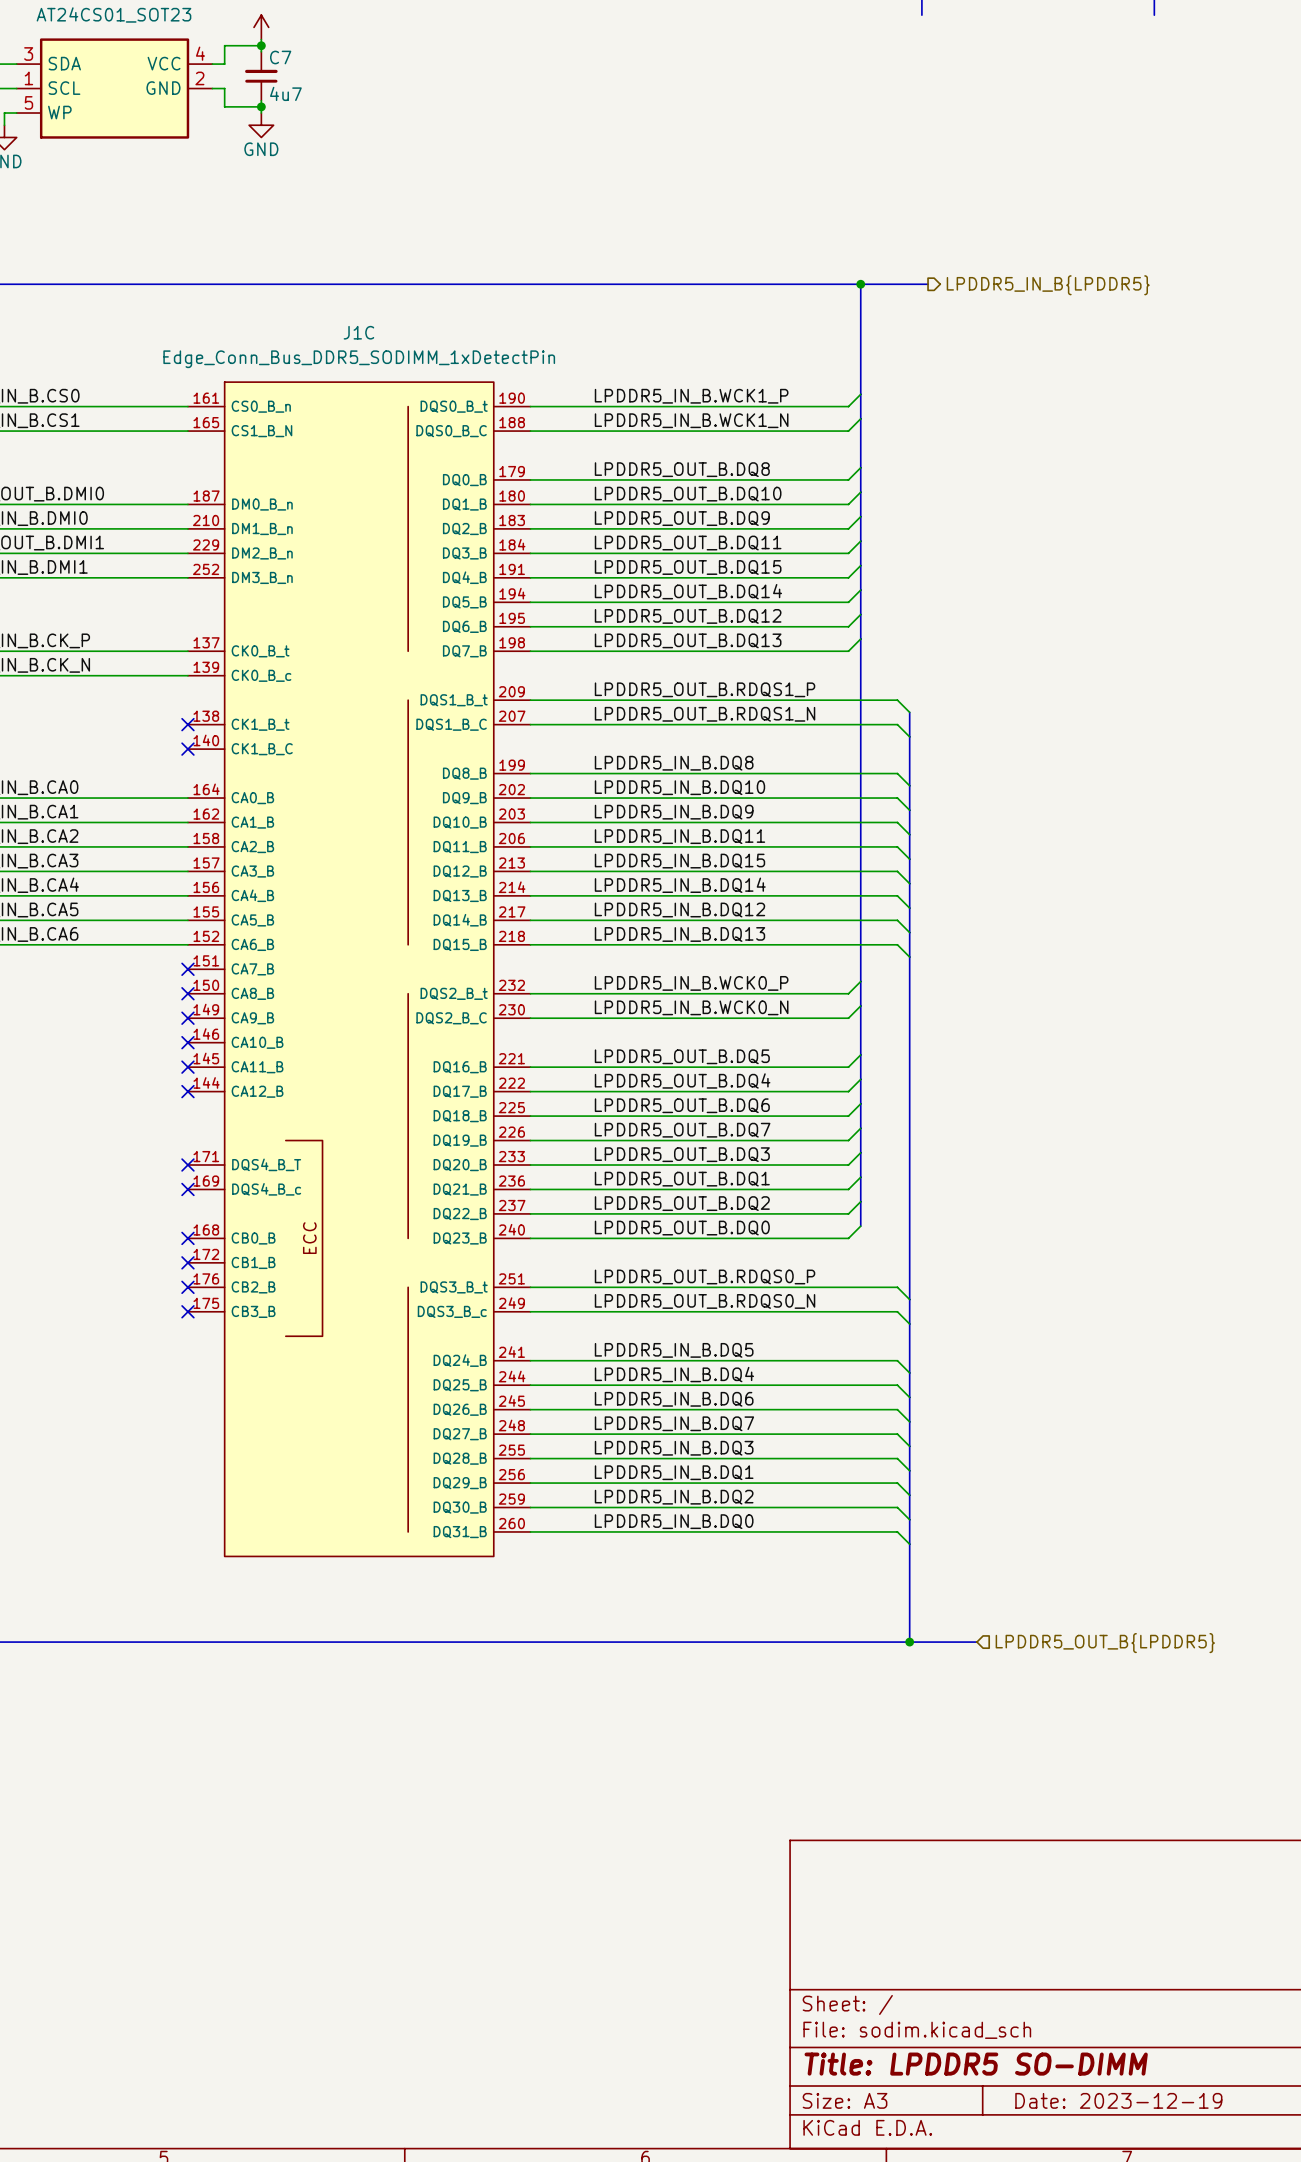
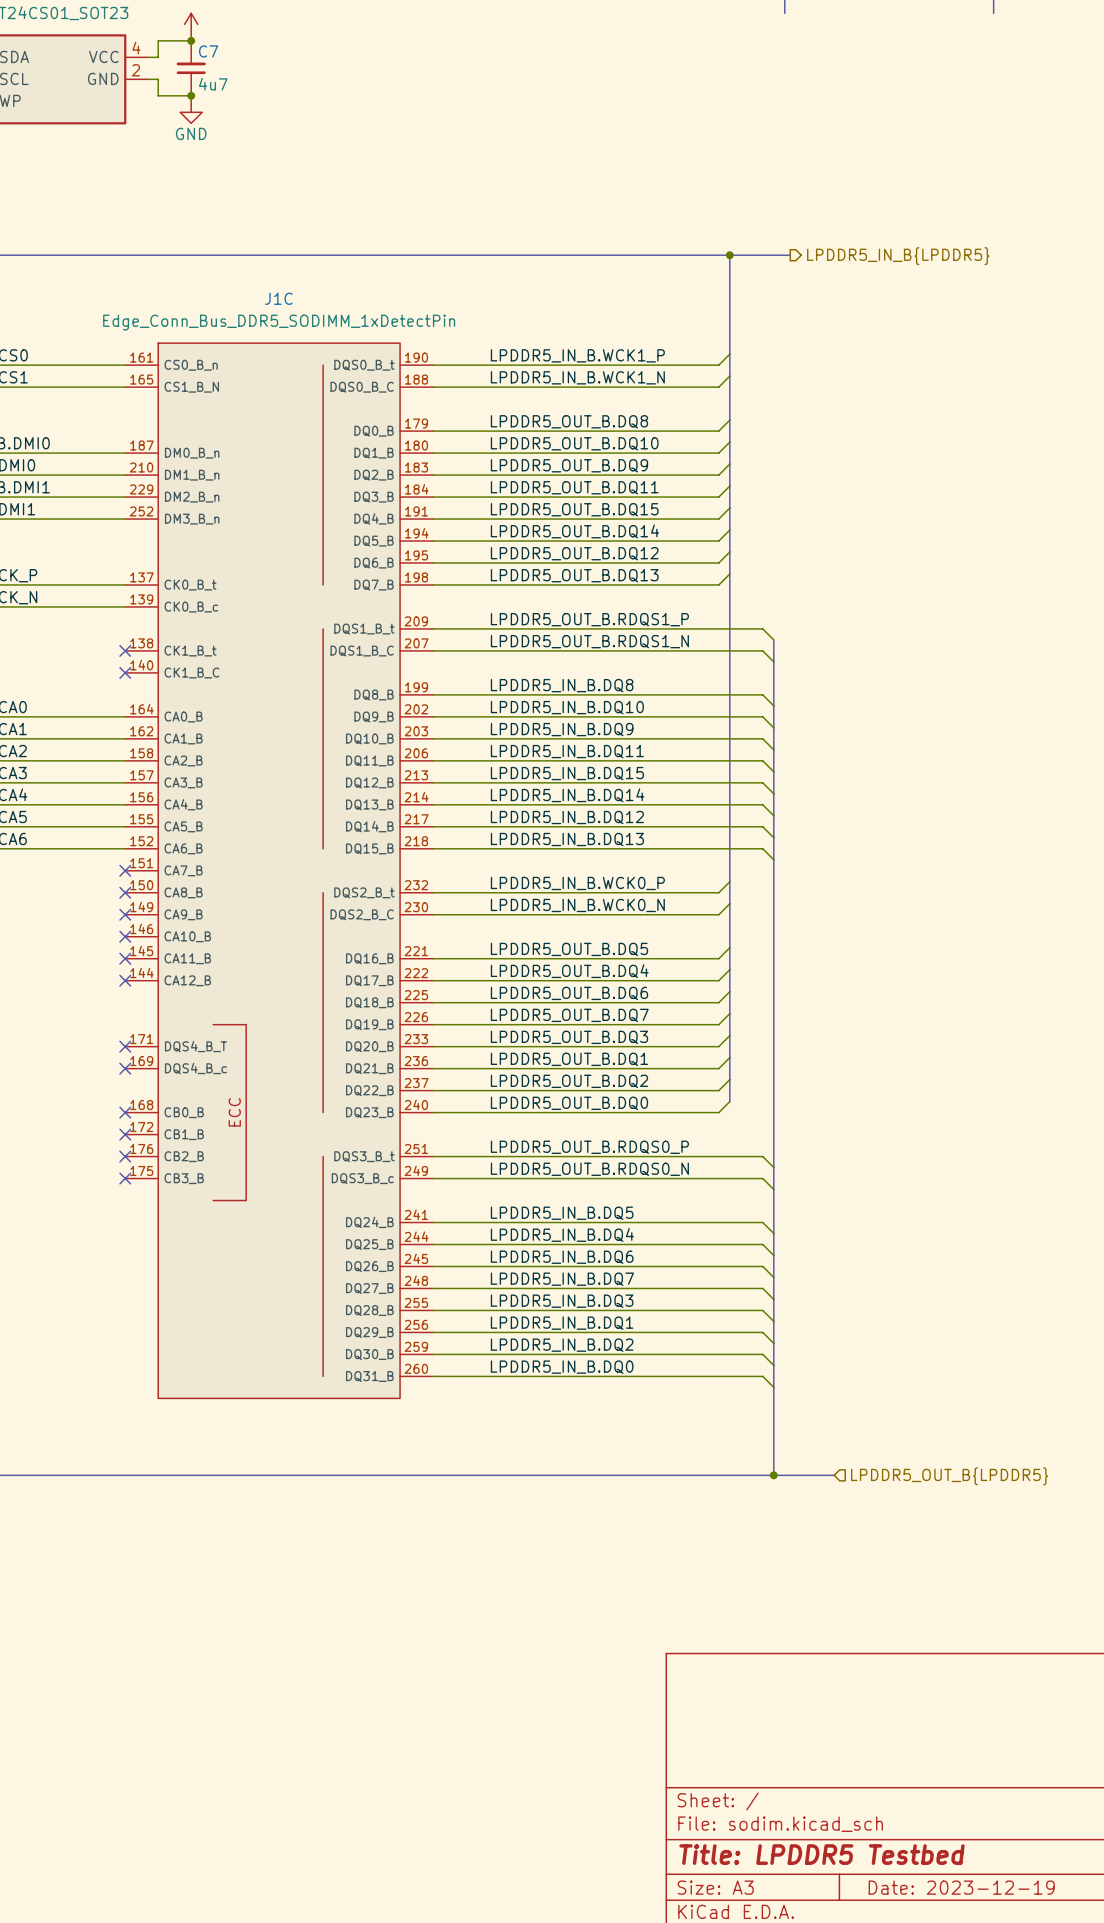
title block: Title: LPDDR5 SO-DIMM (976, 2064) -> Title: LPDDR5 Testbed (821, 1854)

